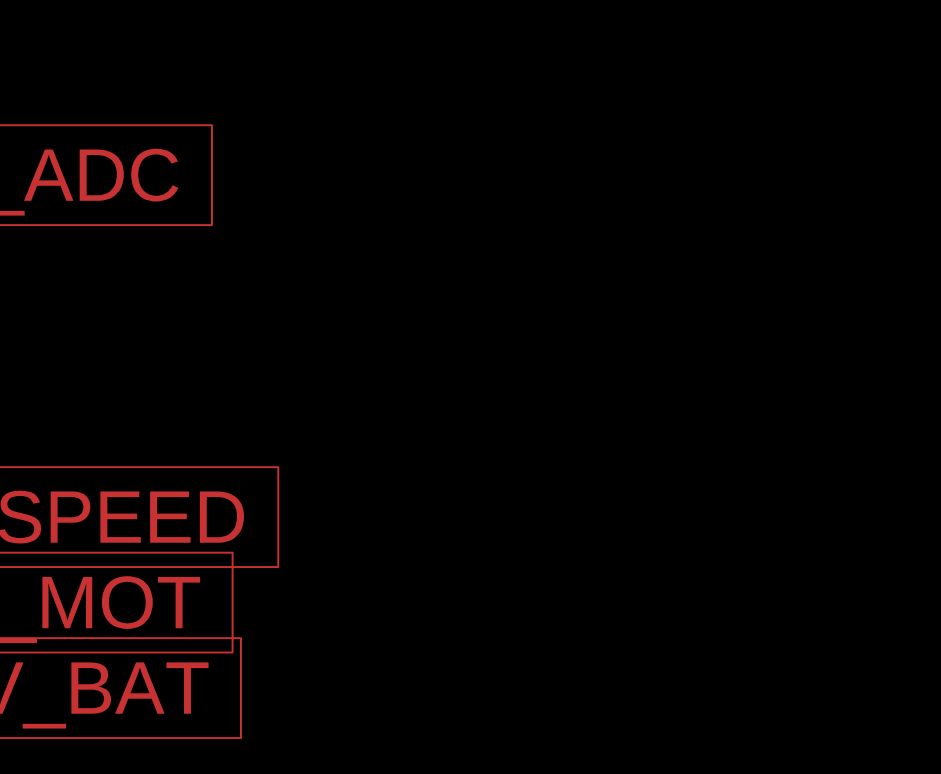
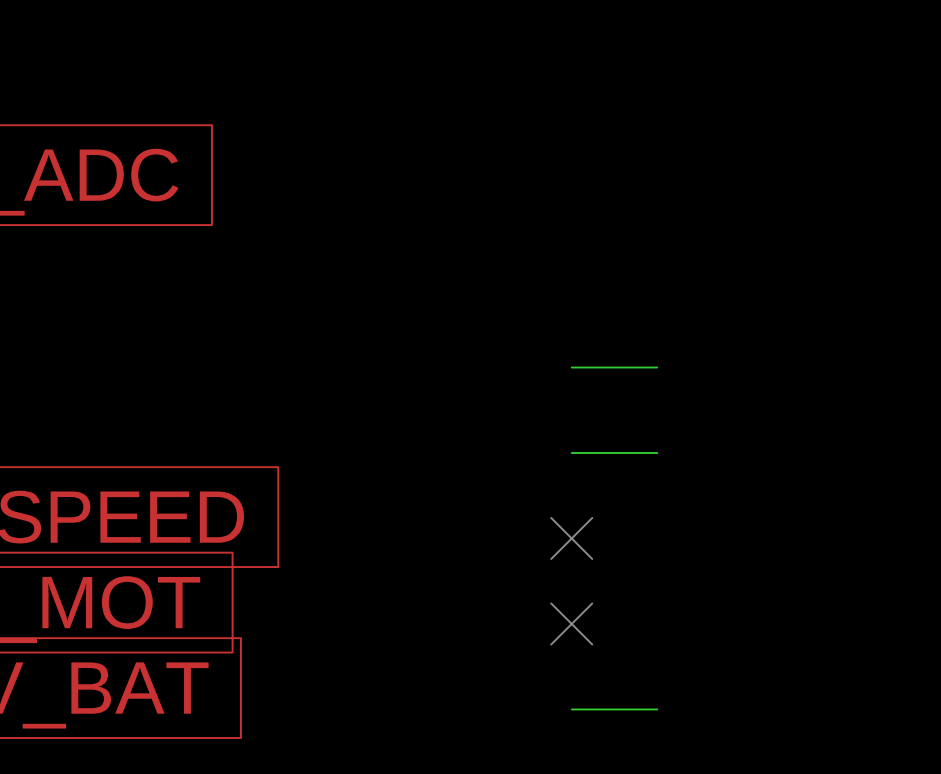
wire: none -> (571, 367) (657, 367)
wire: none -> (571, 452) (657, 452)
no-connect mark: none -> (571, 538)
no-connect mark: none -> (571, 623)
wire: none -> (571, 709) (657, 709)

